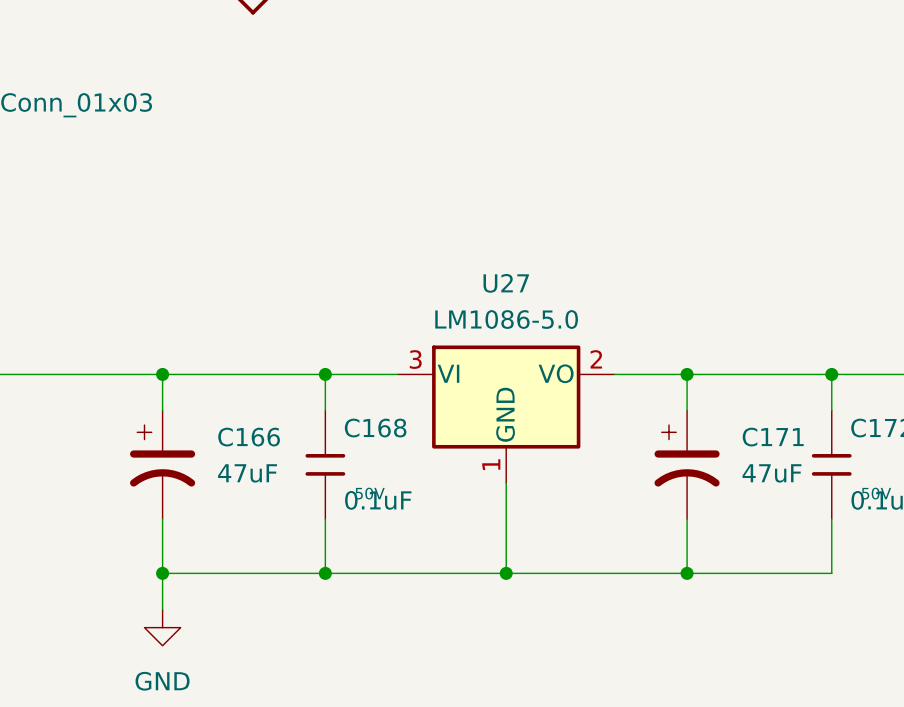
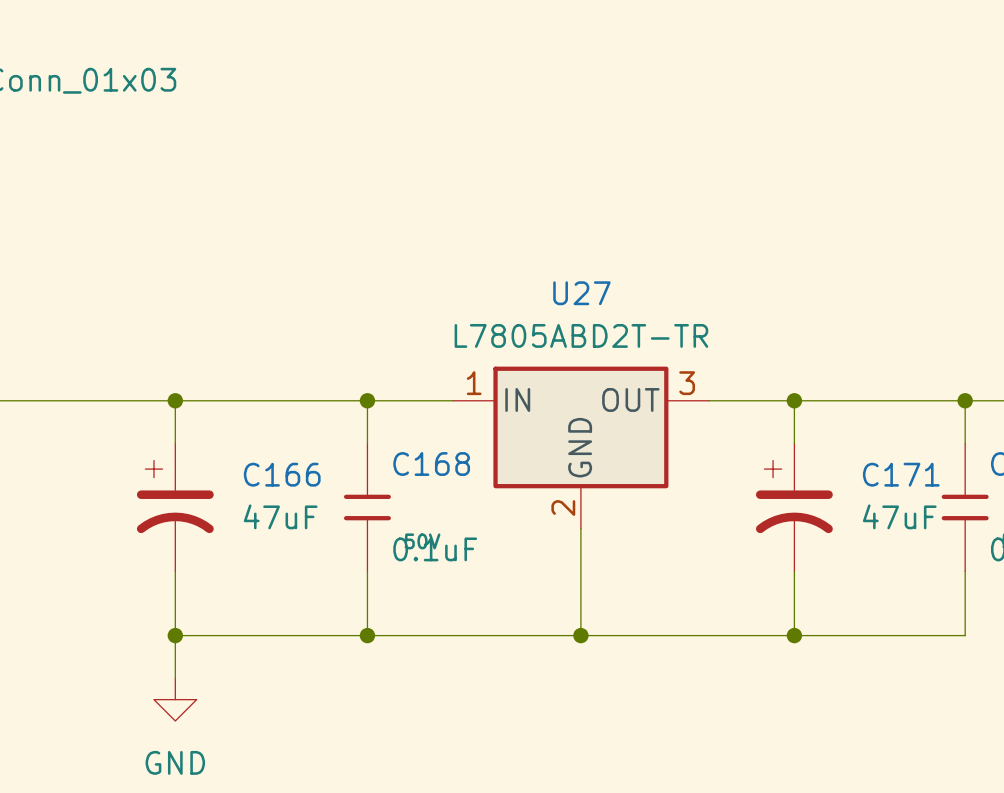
U27 value: LM1086-5.0 (506, 319) -> L7805ABD2T-TR (581, 335)
U27 pin number: 3 (415, 359) -> 1 (474, 383)
U27 pin number: 2 (596, 359) -> 3 (687, 383)
U27 pin name: VI (448, 373) -> IN (517, 399)
U27 pin name: VO (556, 373) -> OUT (630, 399)
U27 pin number: 1 (491, 464) -> 2 (563, 508)

